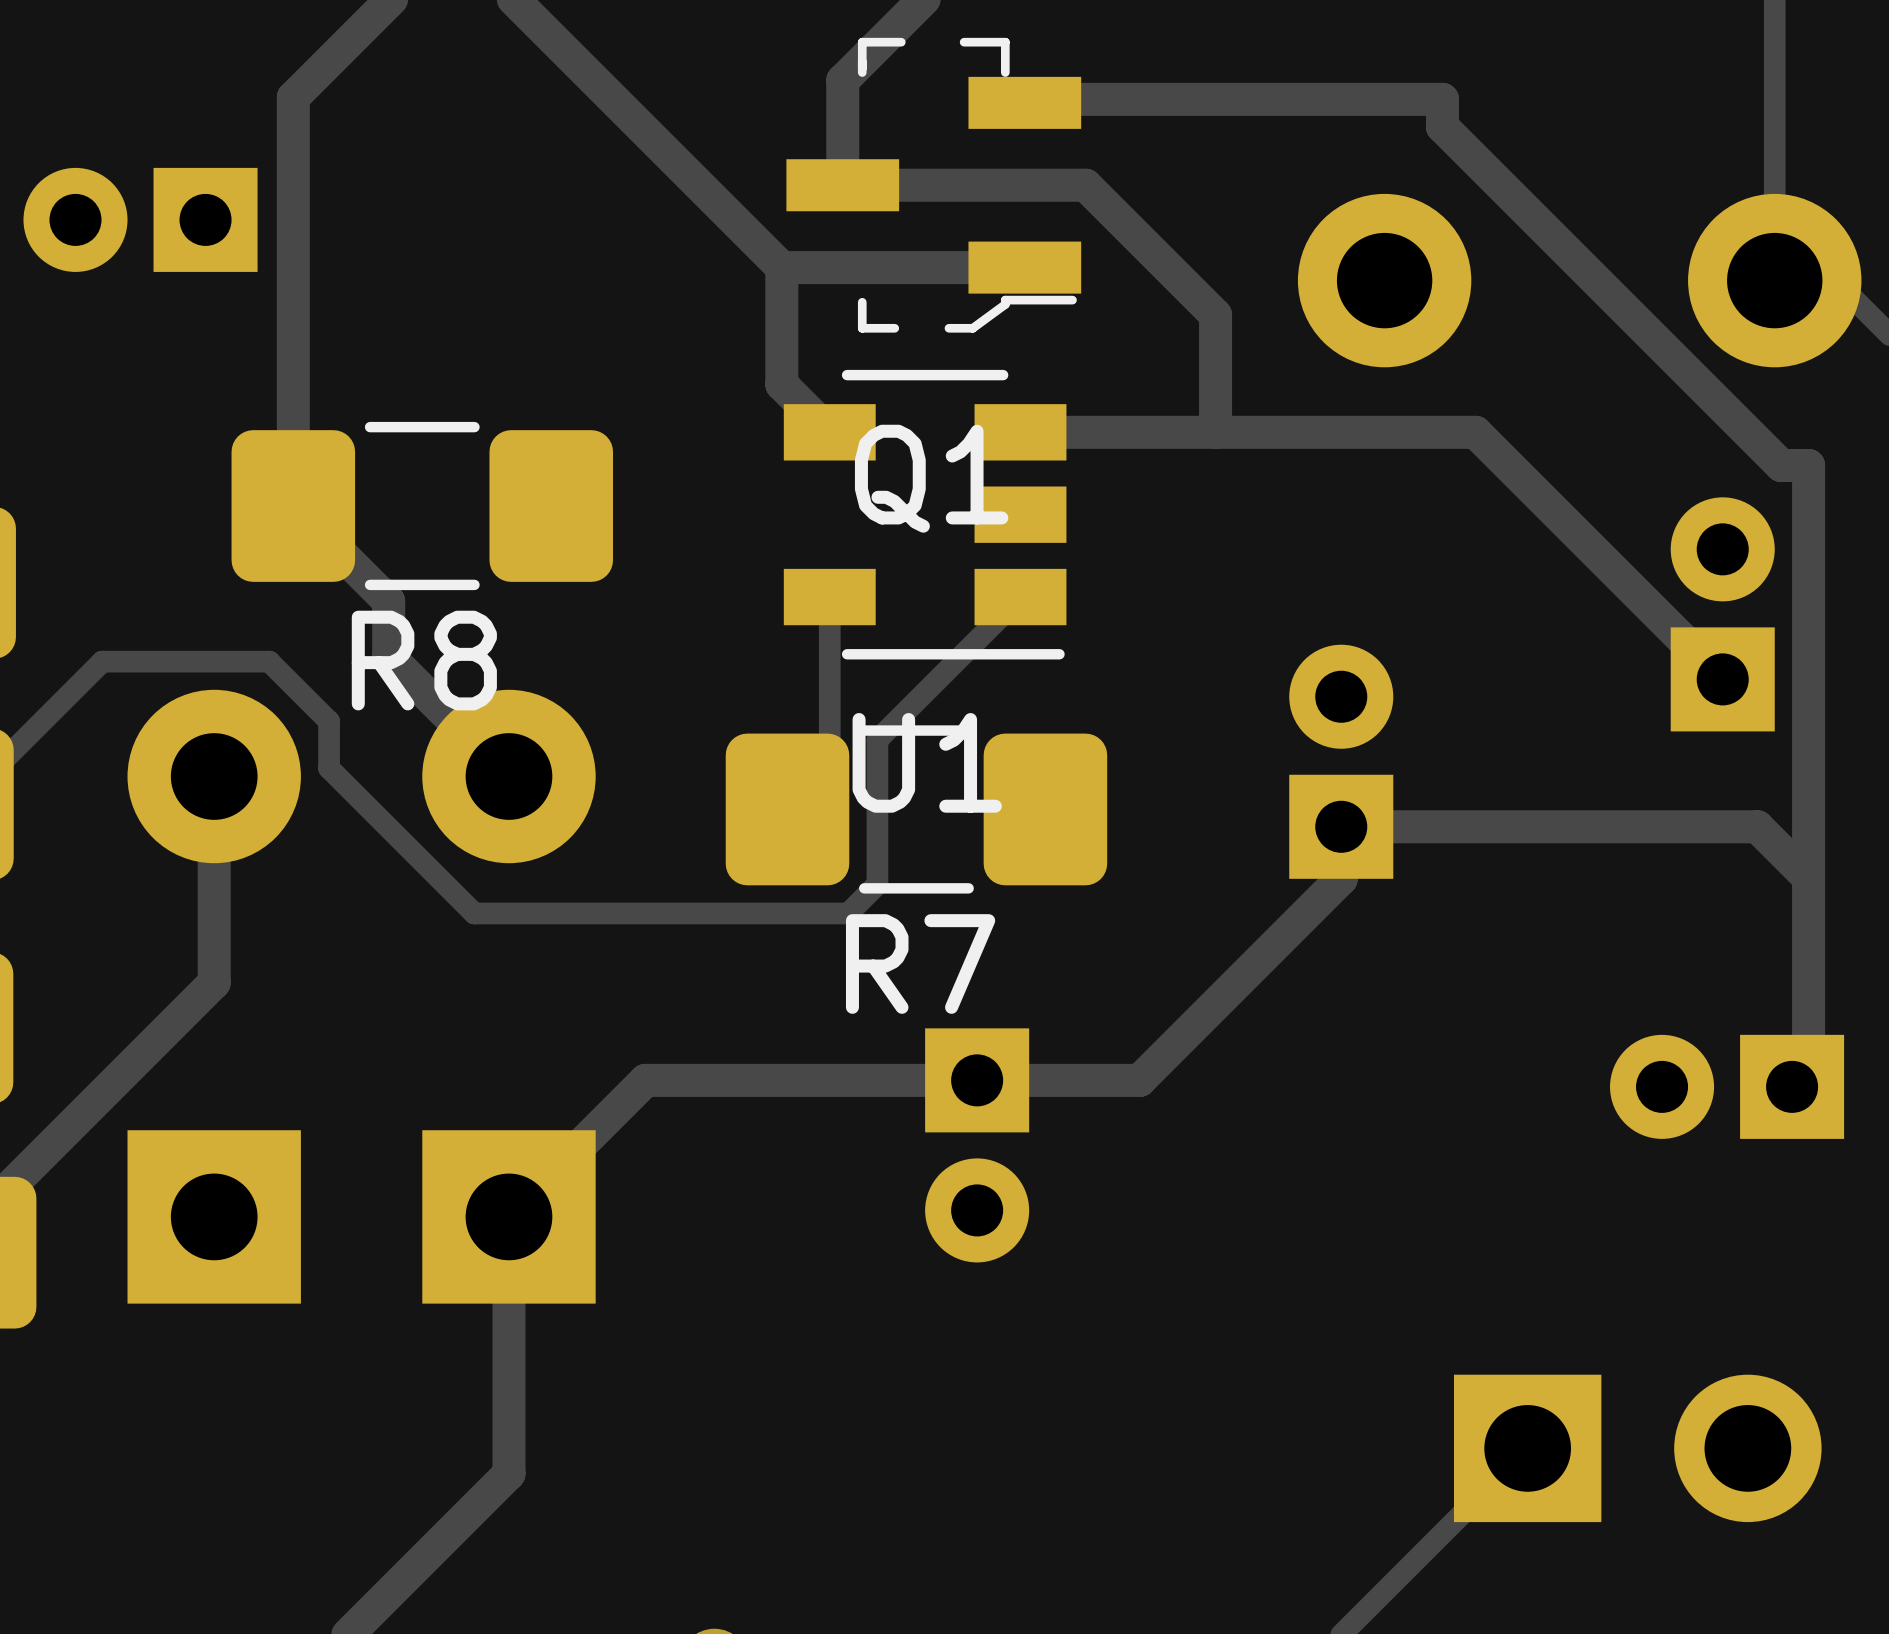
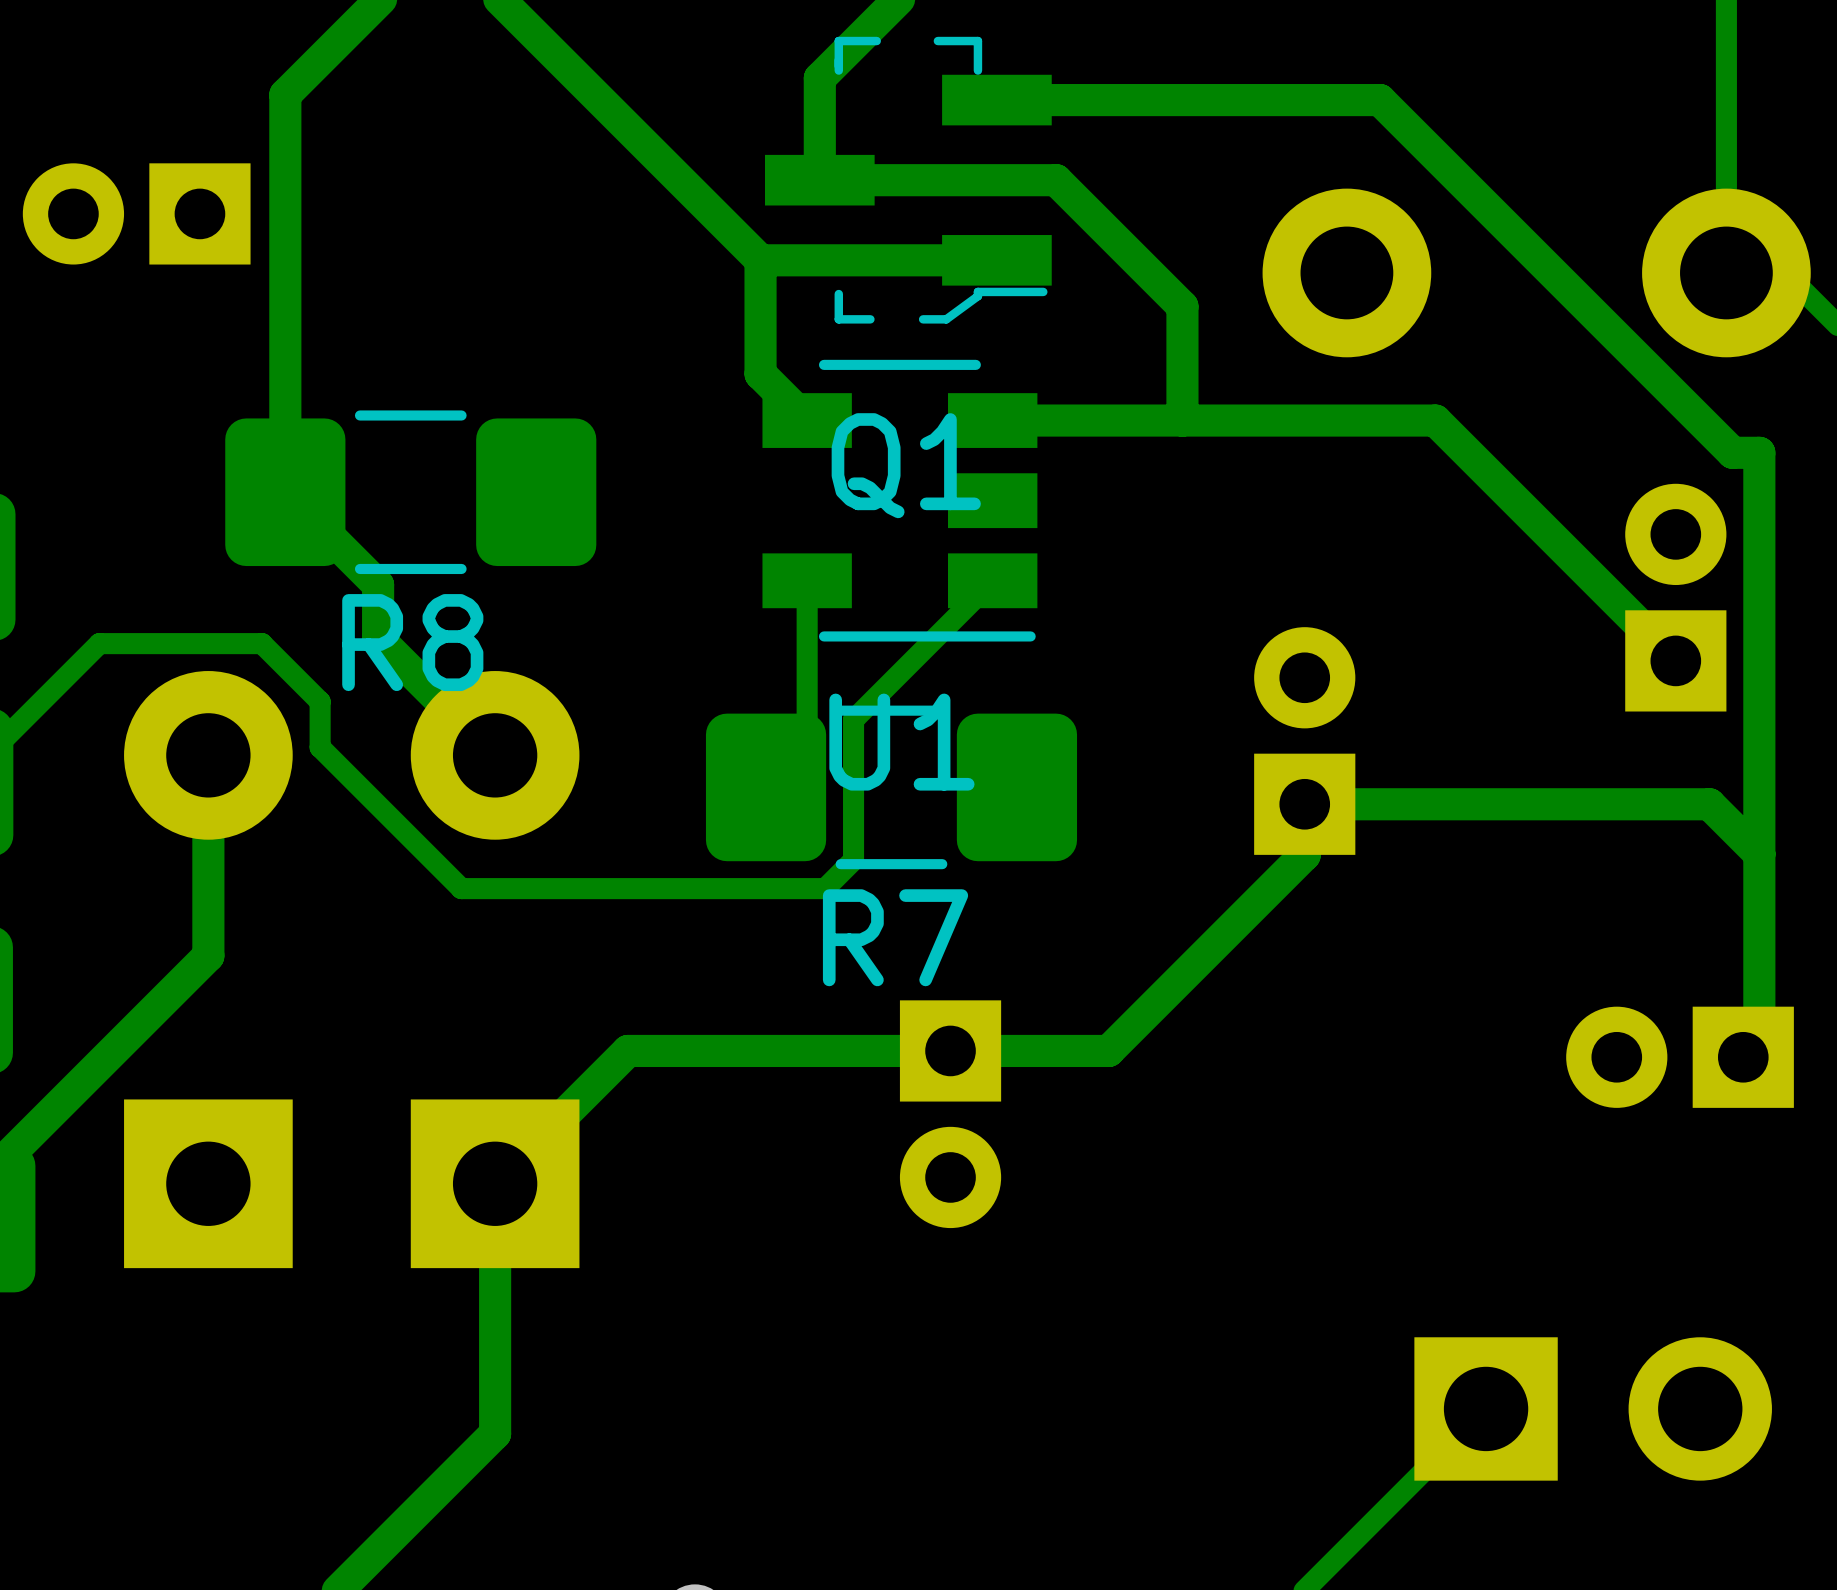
track: (1028, 99) (1442, 99) (1442, 126) -> (996, 100) (1379, 100) (1403, 123)

